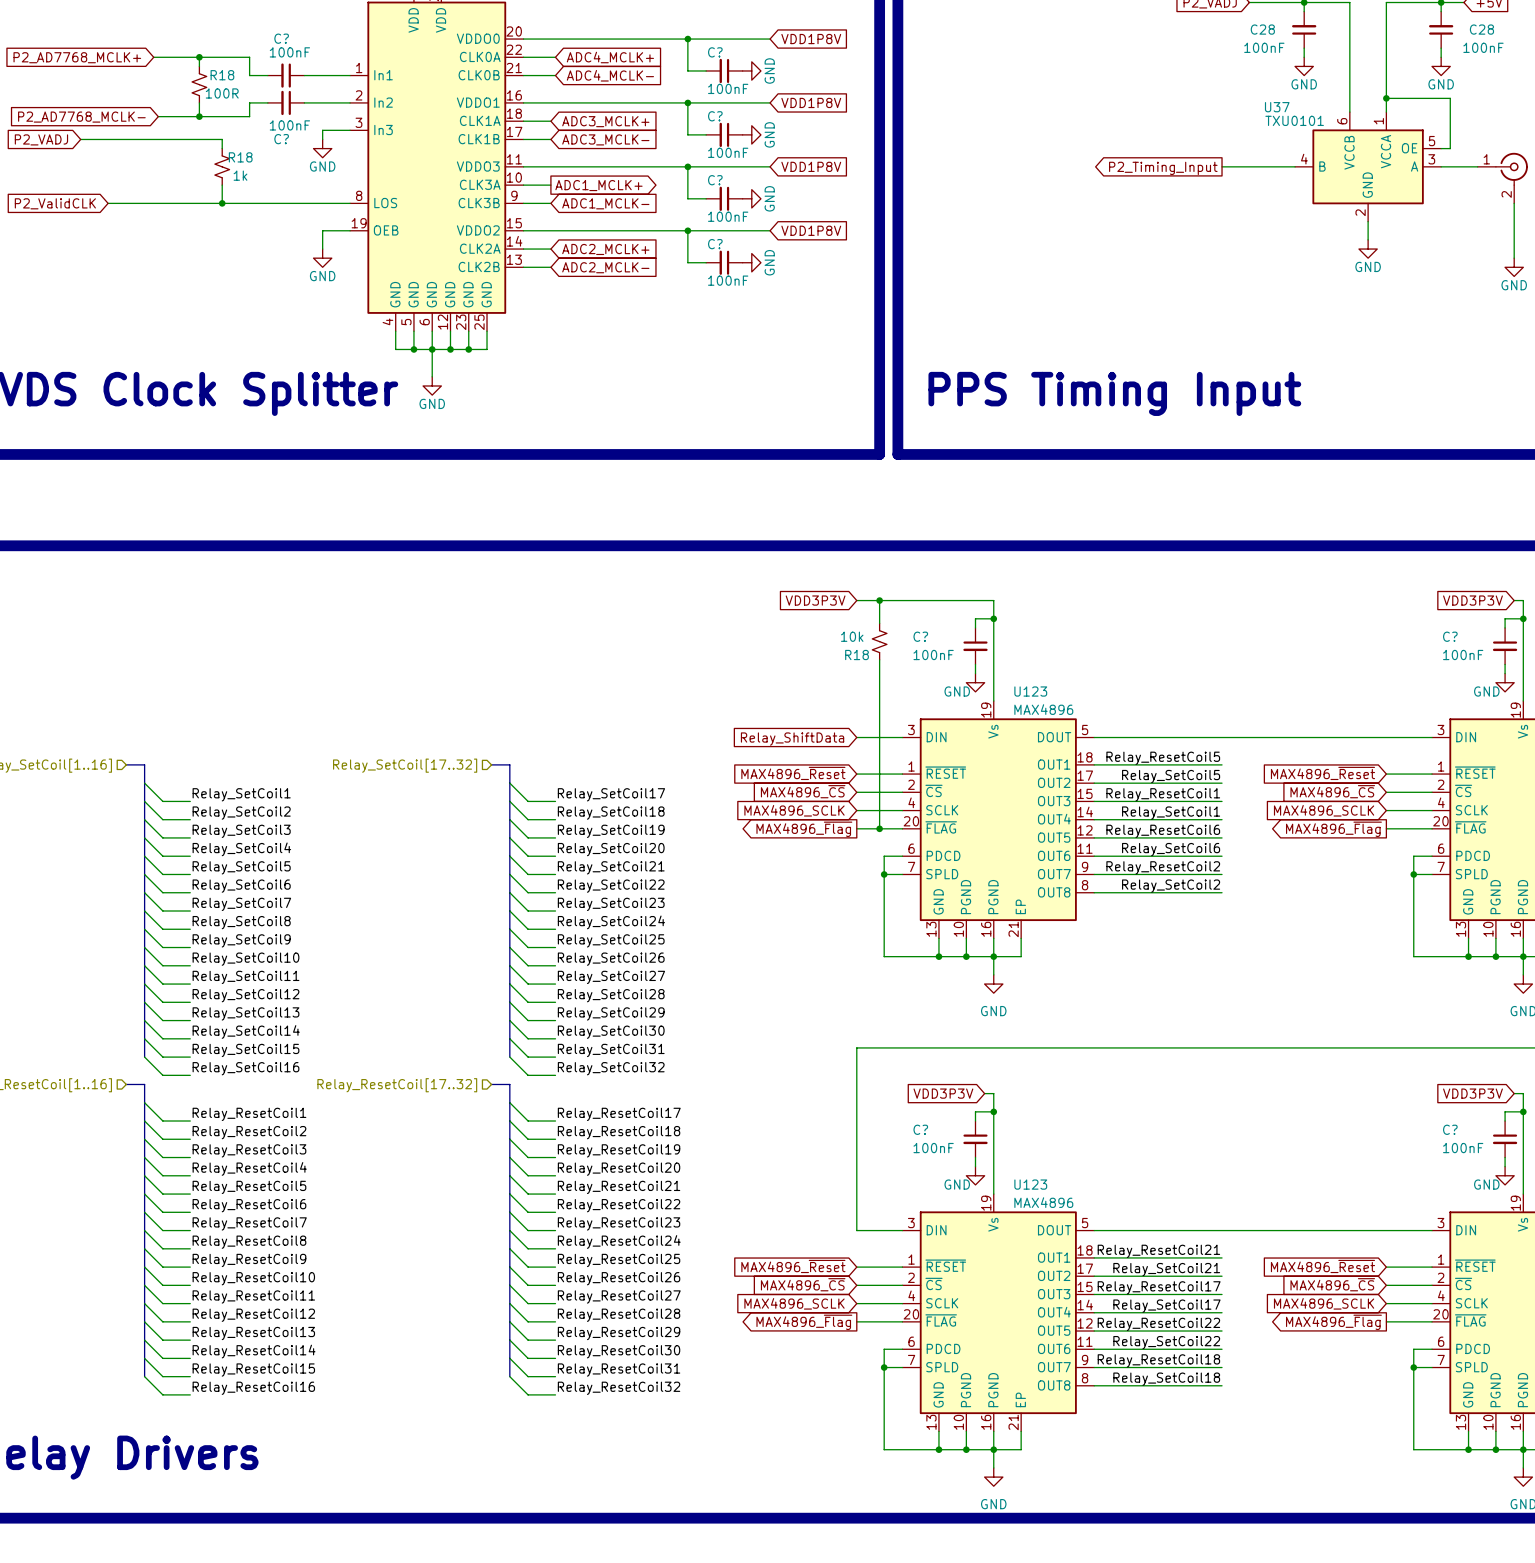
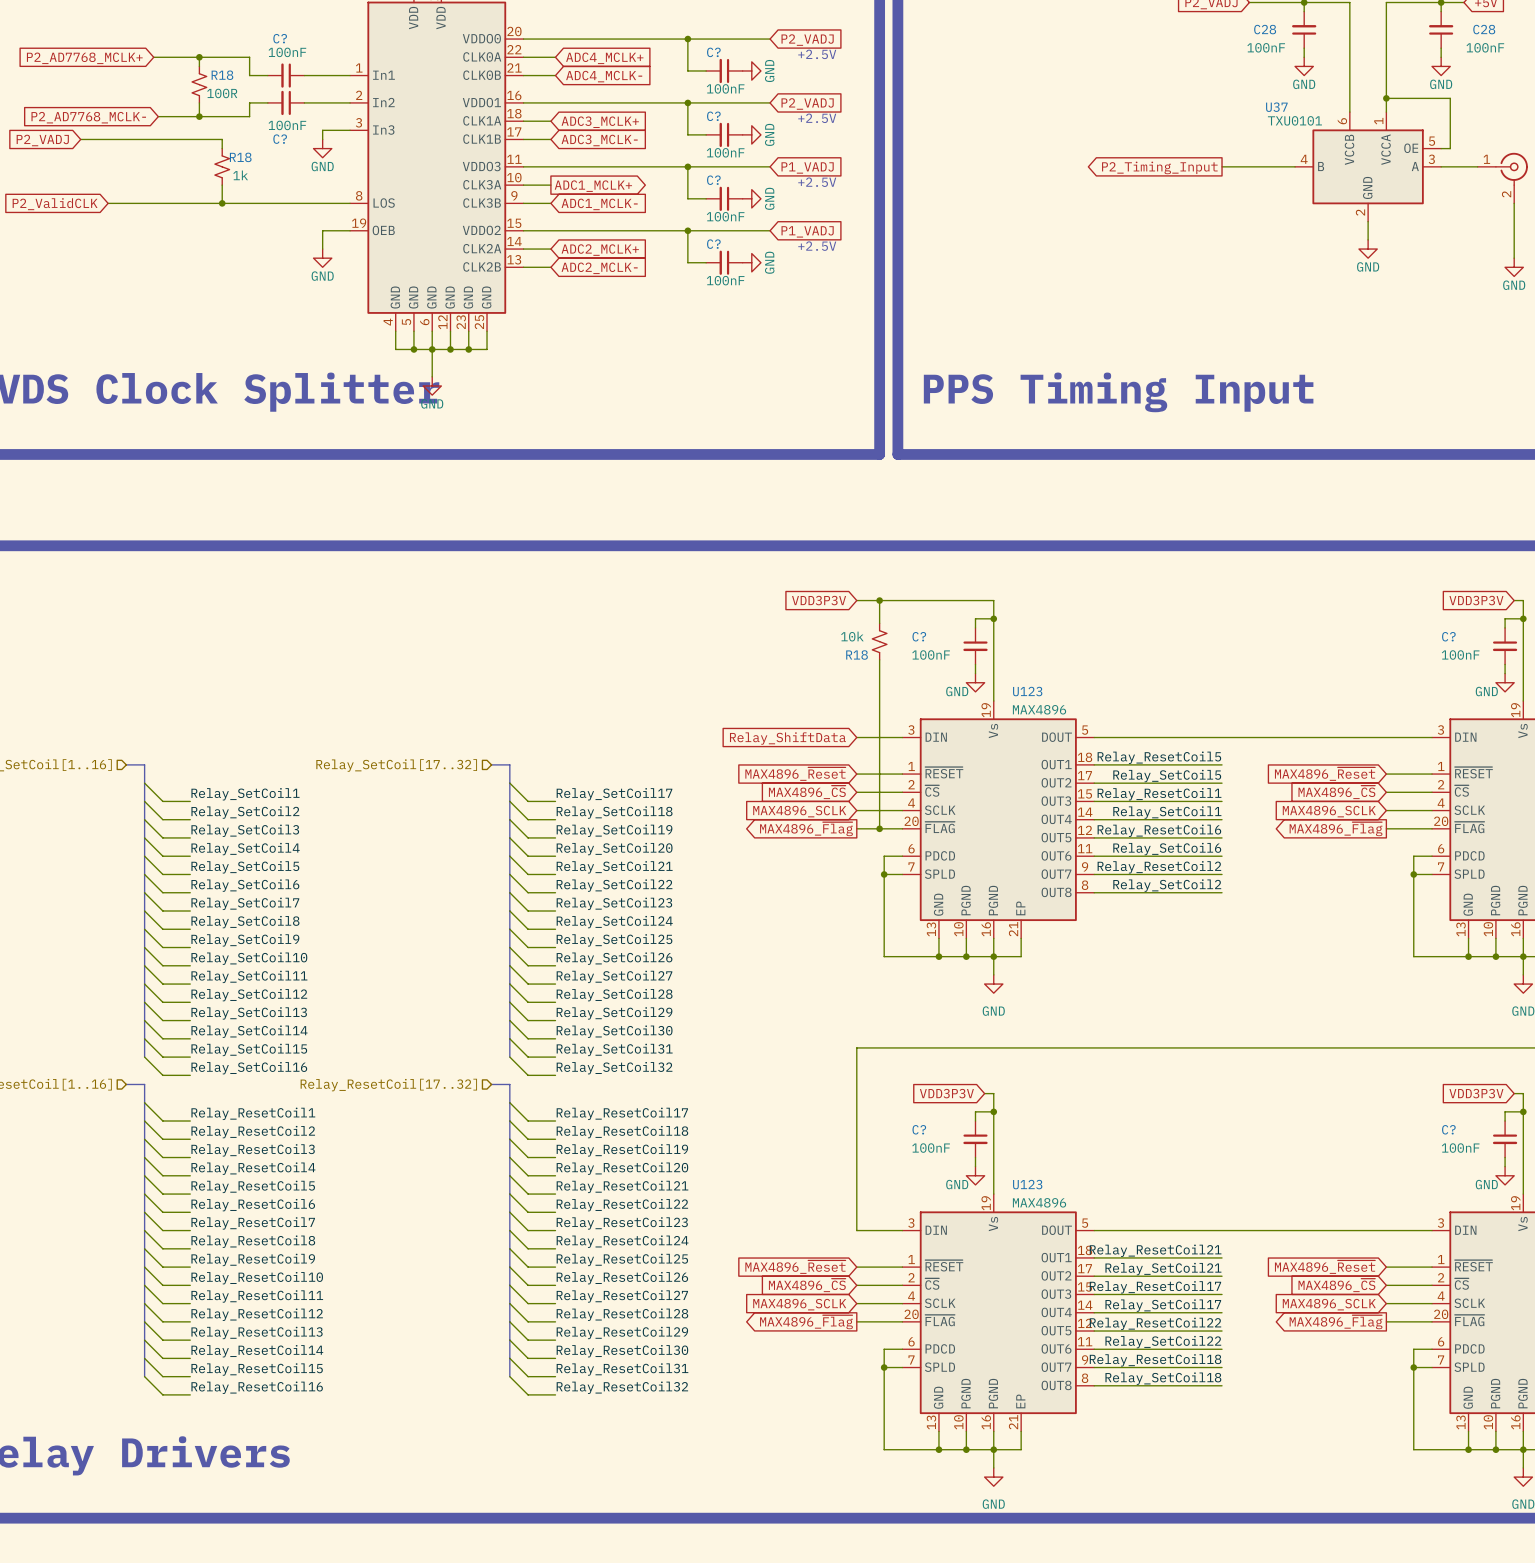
global label: VDD1P8V (811, 39) -> P2_VADJ (807, 40)
text: none -> +2.5V (817, 54)
global label: VDD1P8V (811, 102) -> P2_VADJ (807, 103)
text: none -> +2.5V (817, 118)
global label: VDD1P8V (811, 166) -> P1_VADJ (807, 167)
text: none -> +2.5V (817, 182)
global label: VDD1P8V (811, 230) -> P1_VADJ (807, 231)
text: none -> +2.5V (817, 246)

